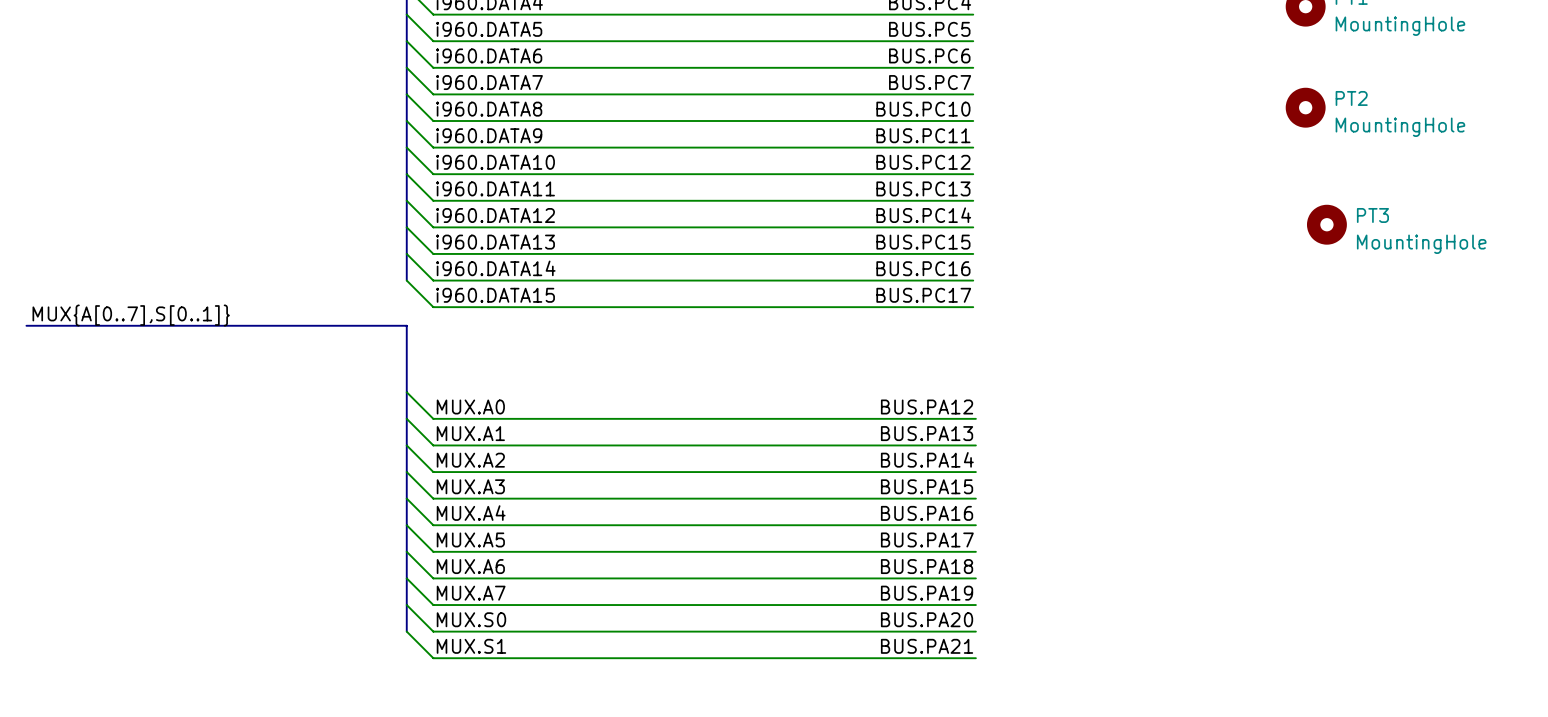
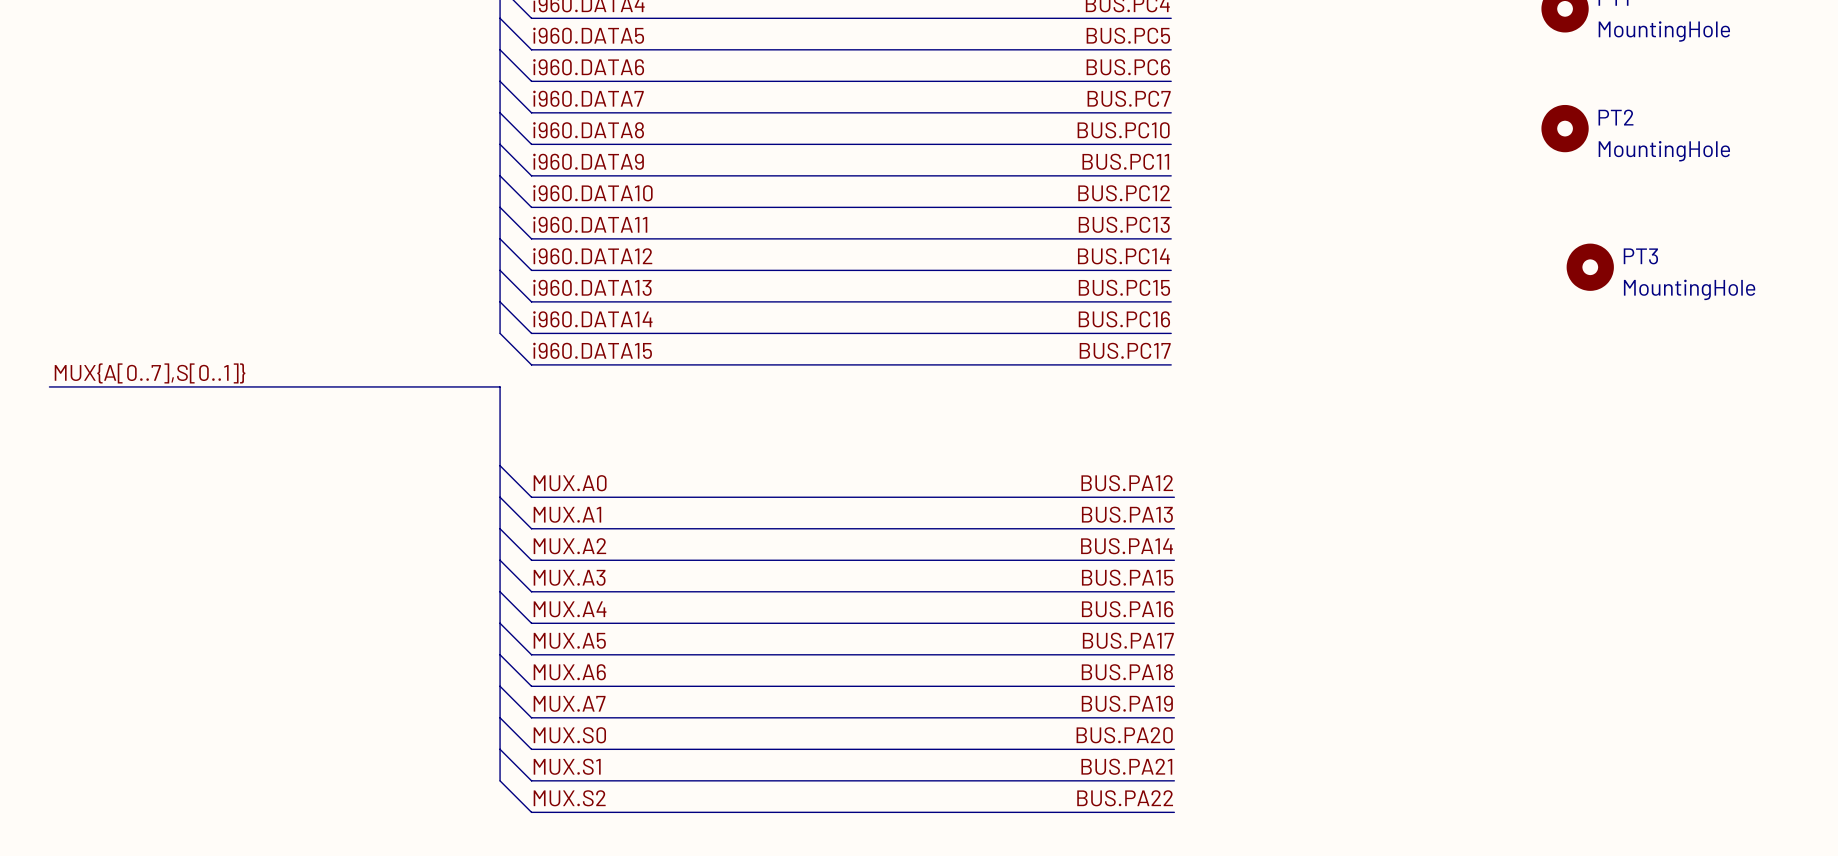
bus: none -> (500, 749) (500, 780)
wire: none -> (500, 780) (531, 812) (1174, 812)
label: none -> MUX.S2 (569, 798)
label: none -> BUS.PA22 (1125, 798)

